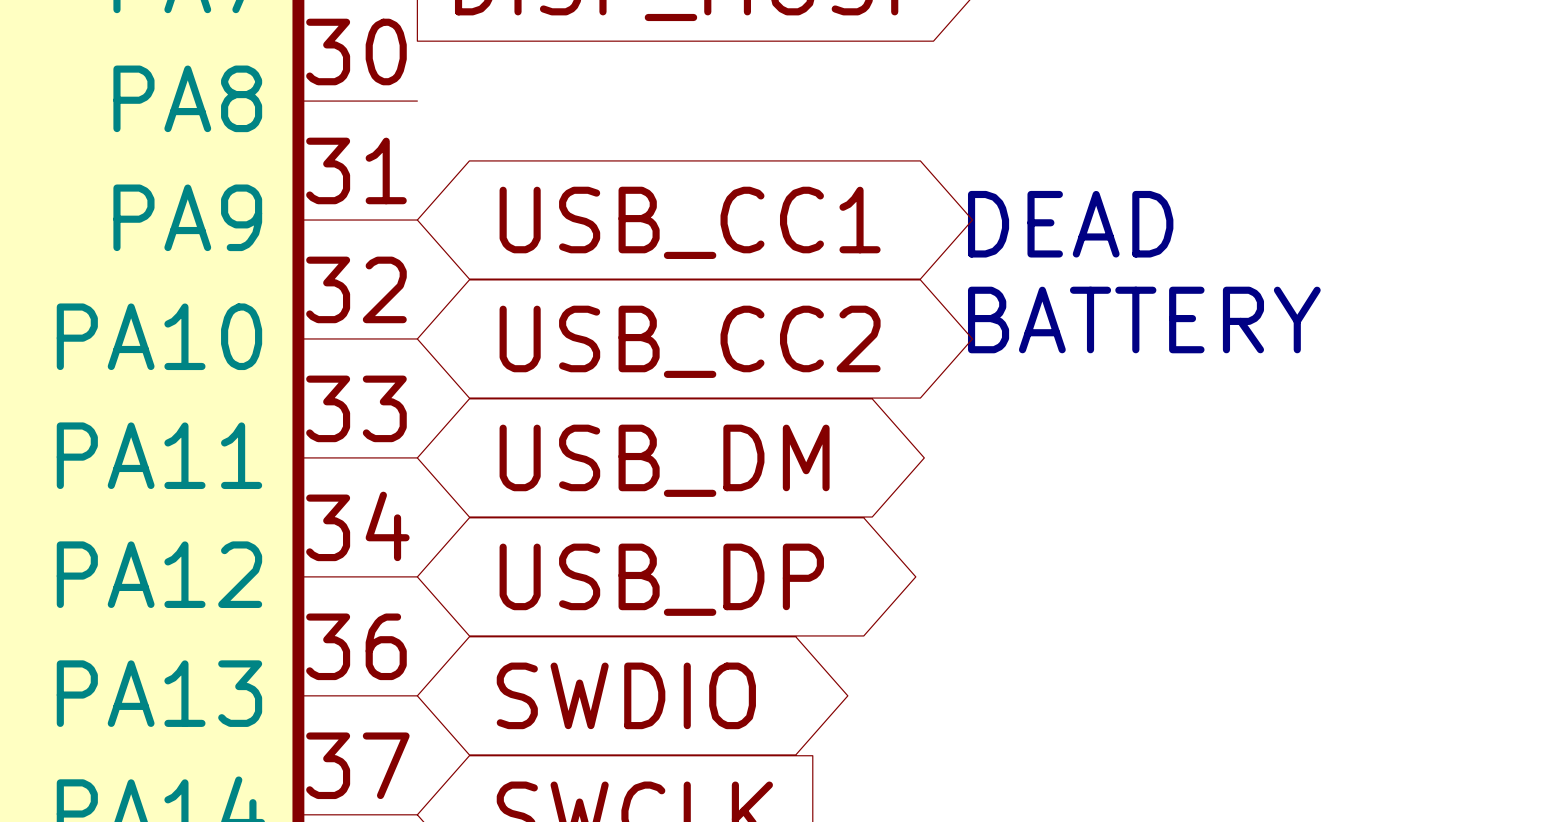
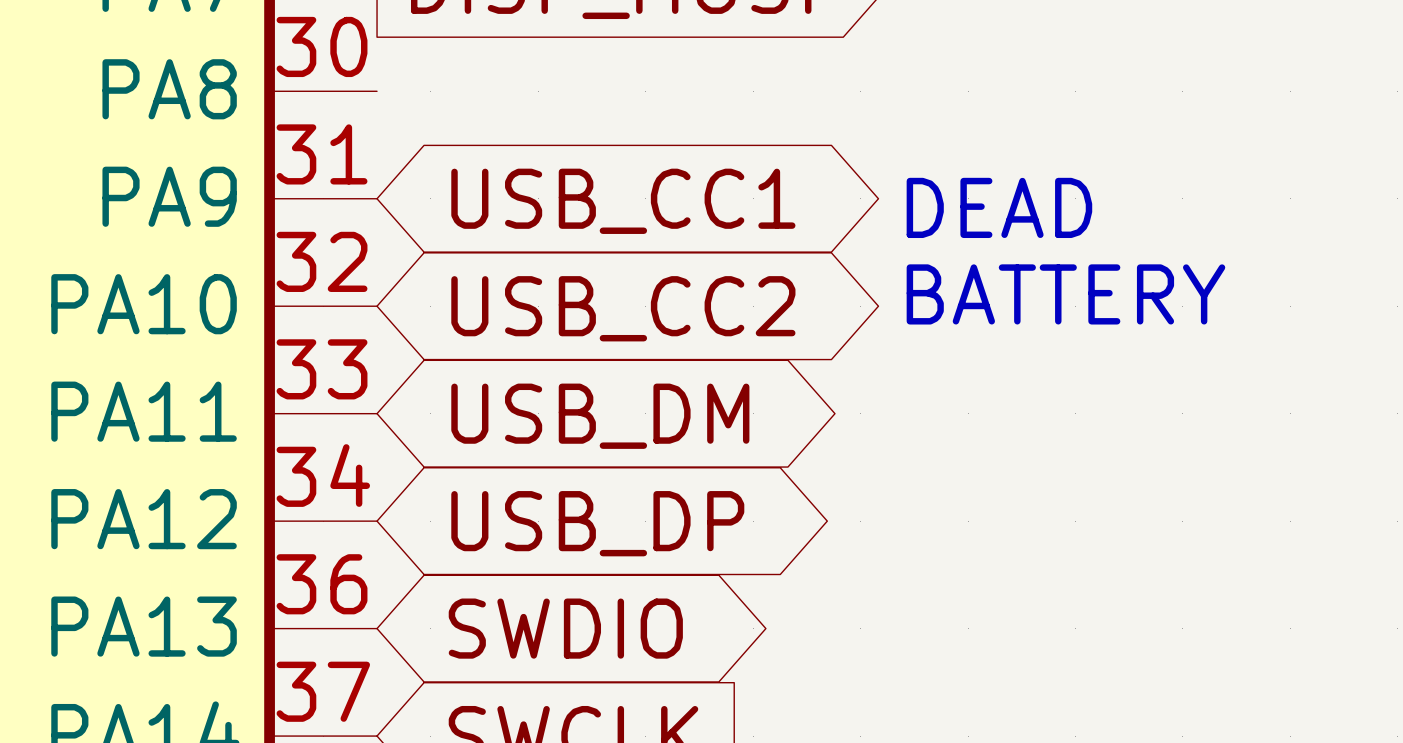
text position: DEAD (1070, 224) -> DEAD (999, 207)
text position: BATTERY (1144, 319) -> BATTERY (1065, 294)

